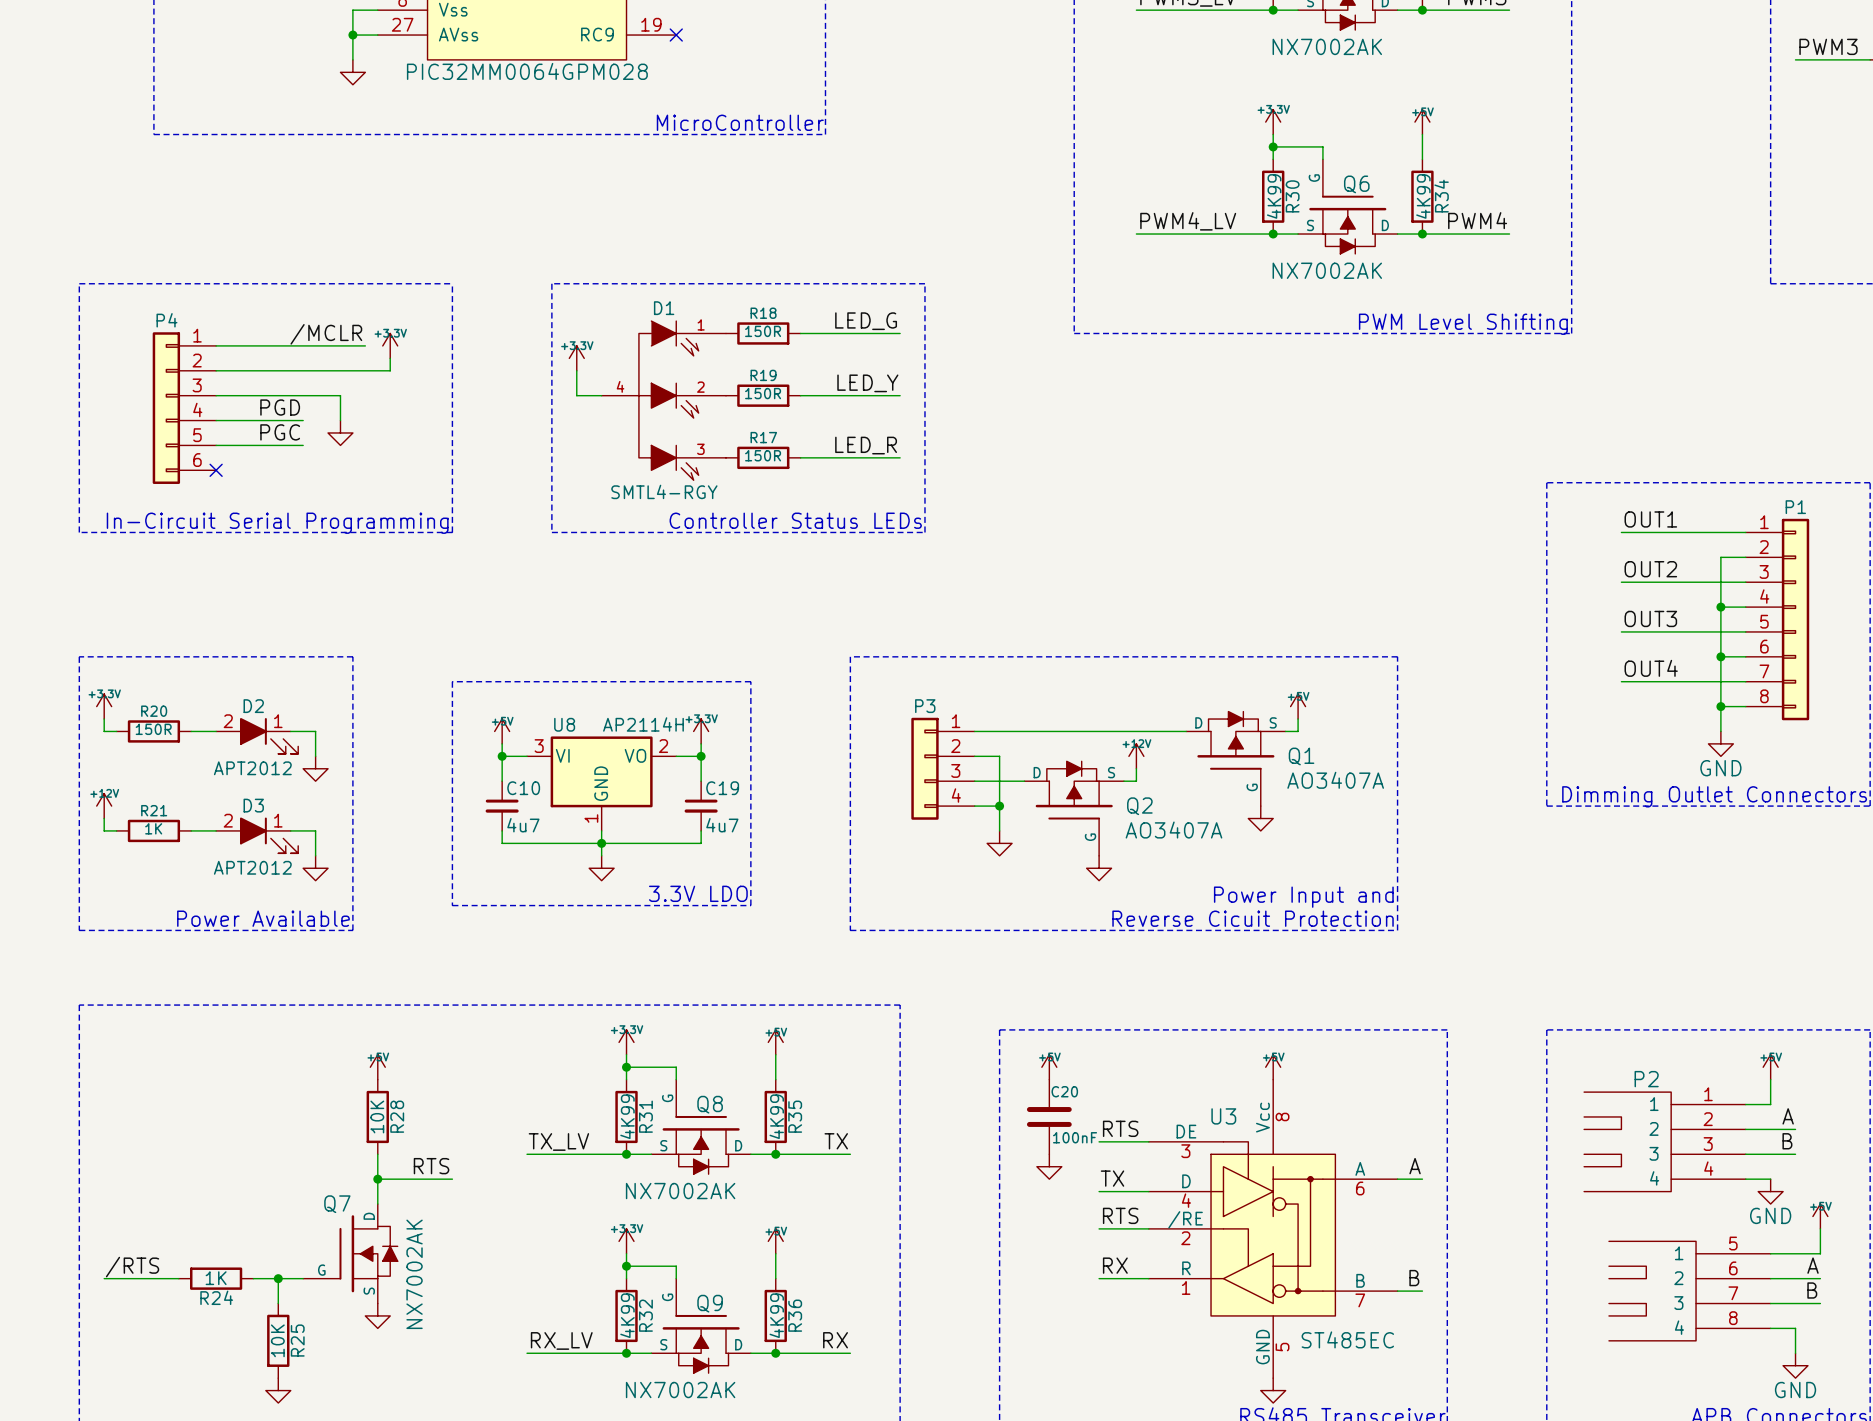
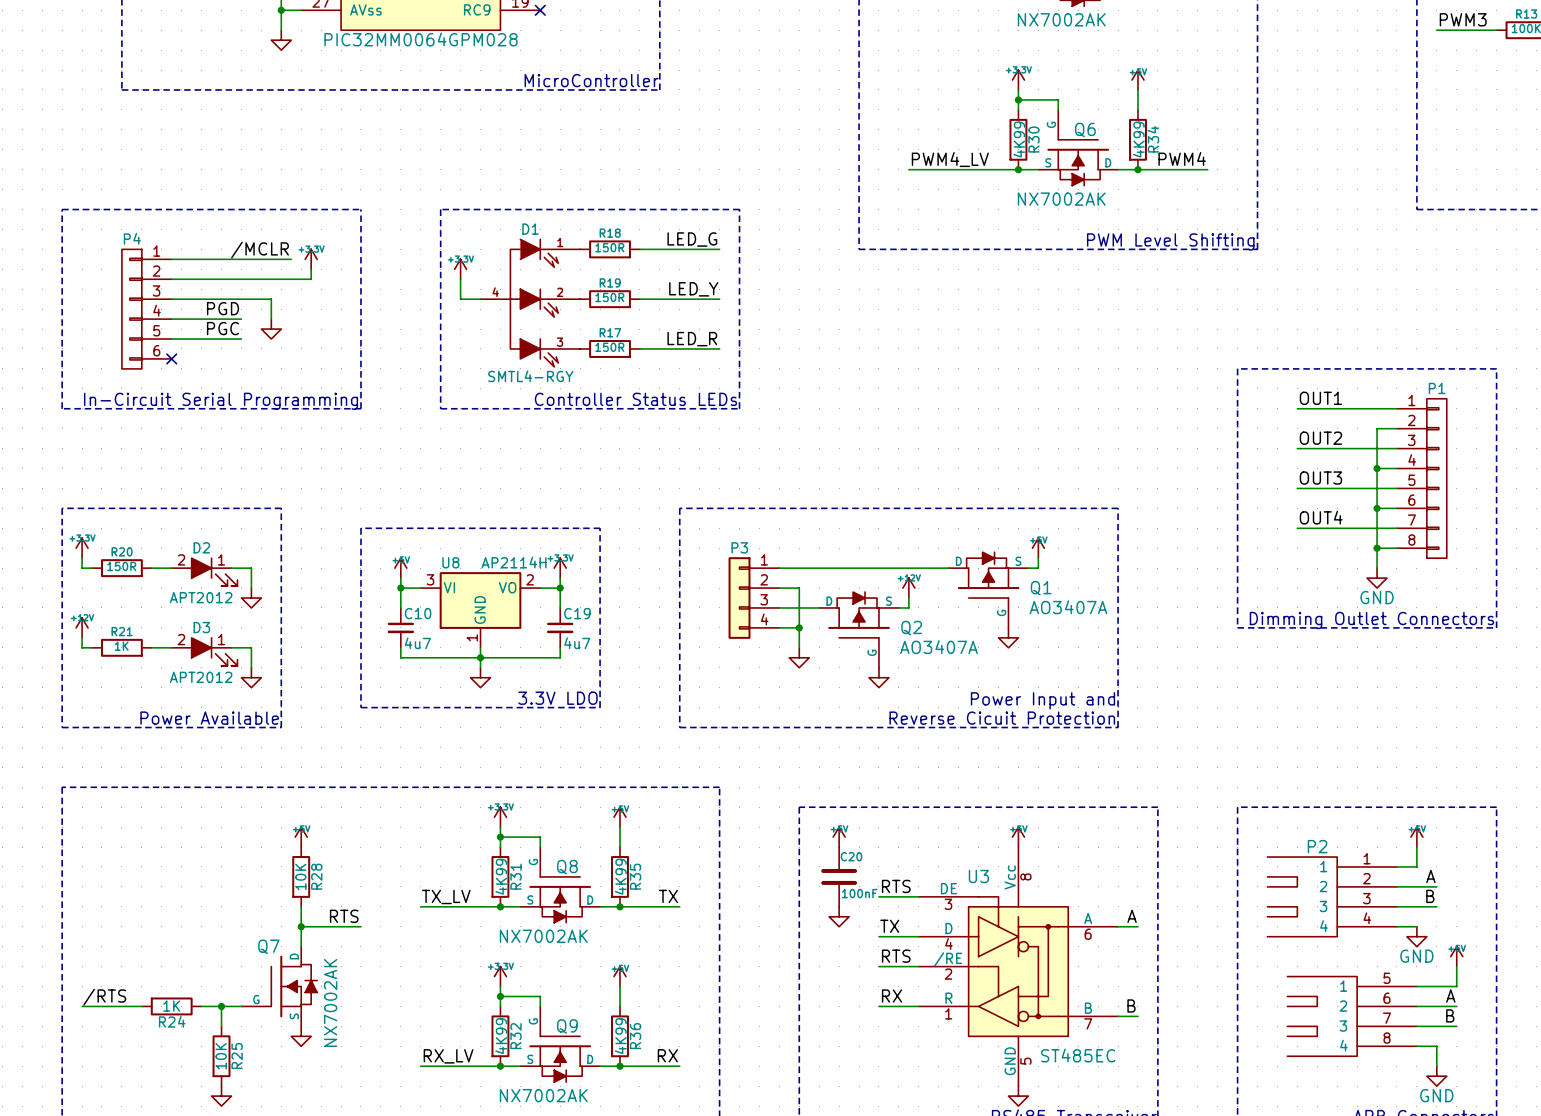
P4 symbol: [152, 332, 217, 484] -> [121, 249, 172, 369]
P1 symbol: [1745, 518, 1810, 721] -> [1396, 398, 1447, 559]

